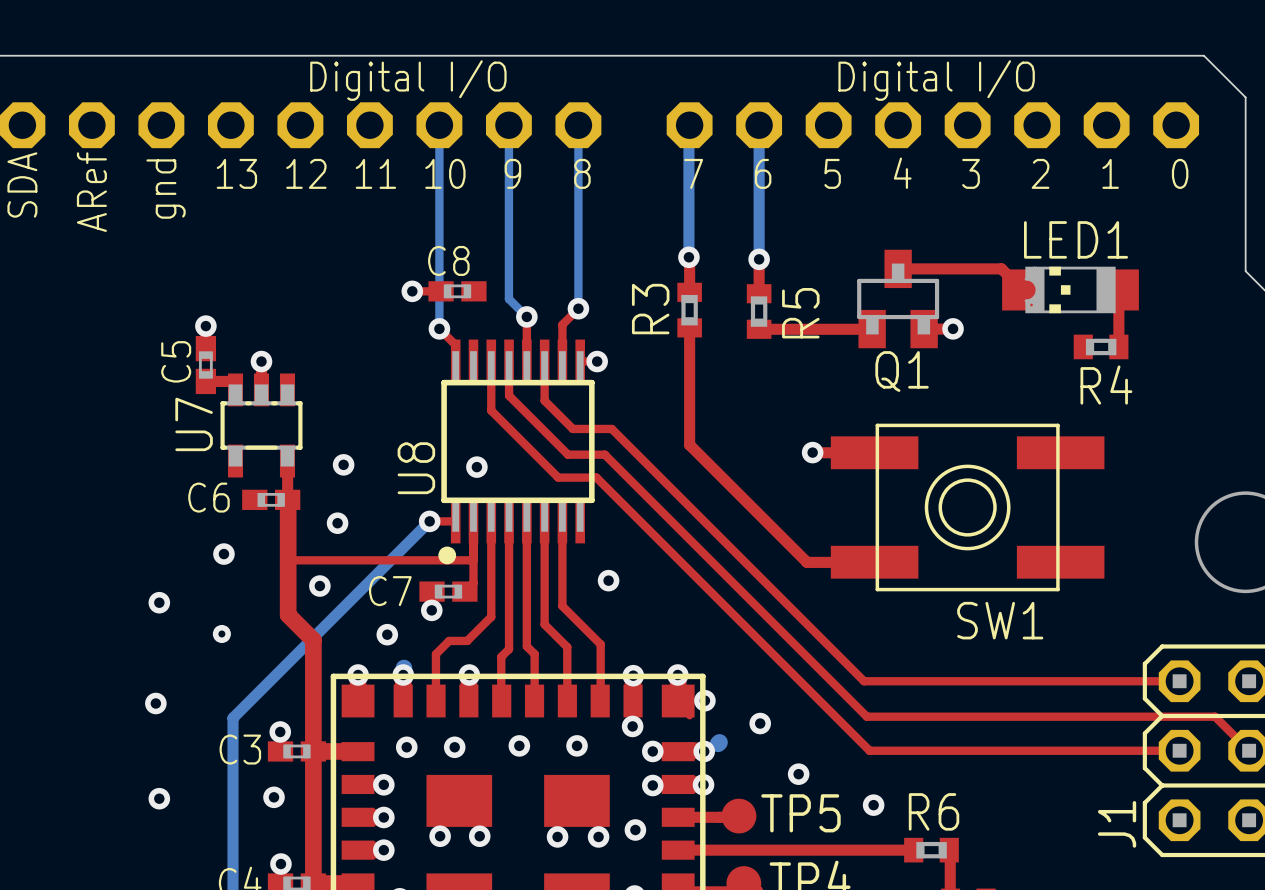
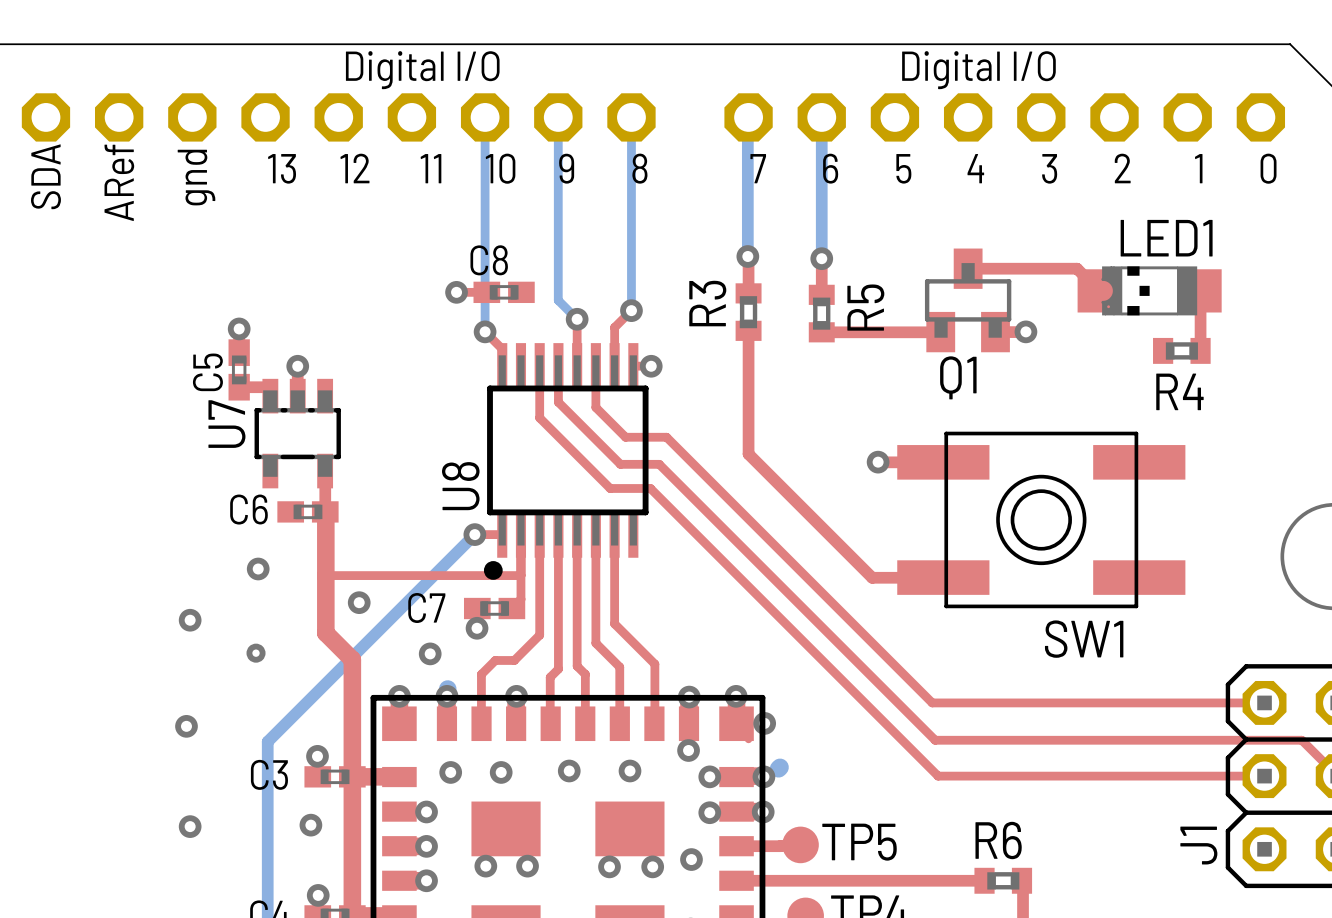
via: (343, 464) -> none
via: (476, 467) -> none
via: (337, 523) -> none
via: (608, 580) -> none
via: (760, 723) -> none
via: (798, 774) -> none
via: (873, 805) -> none

